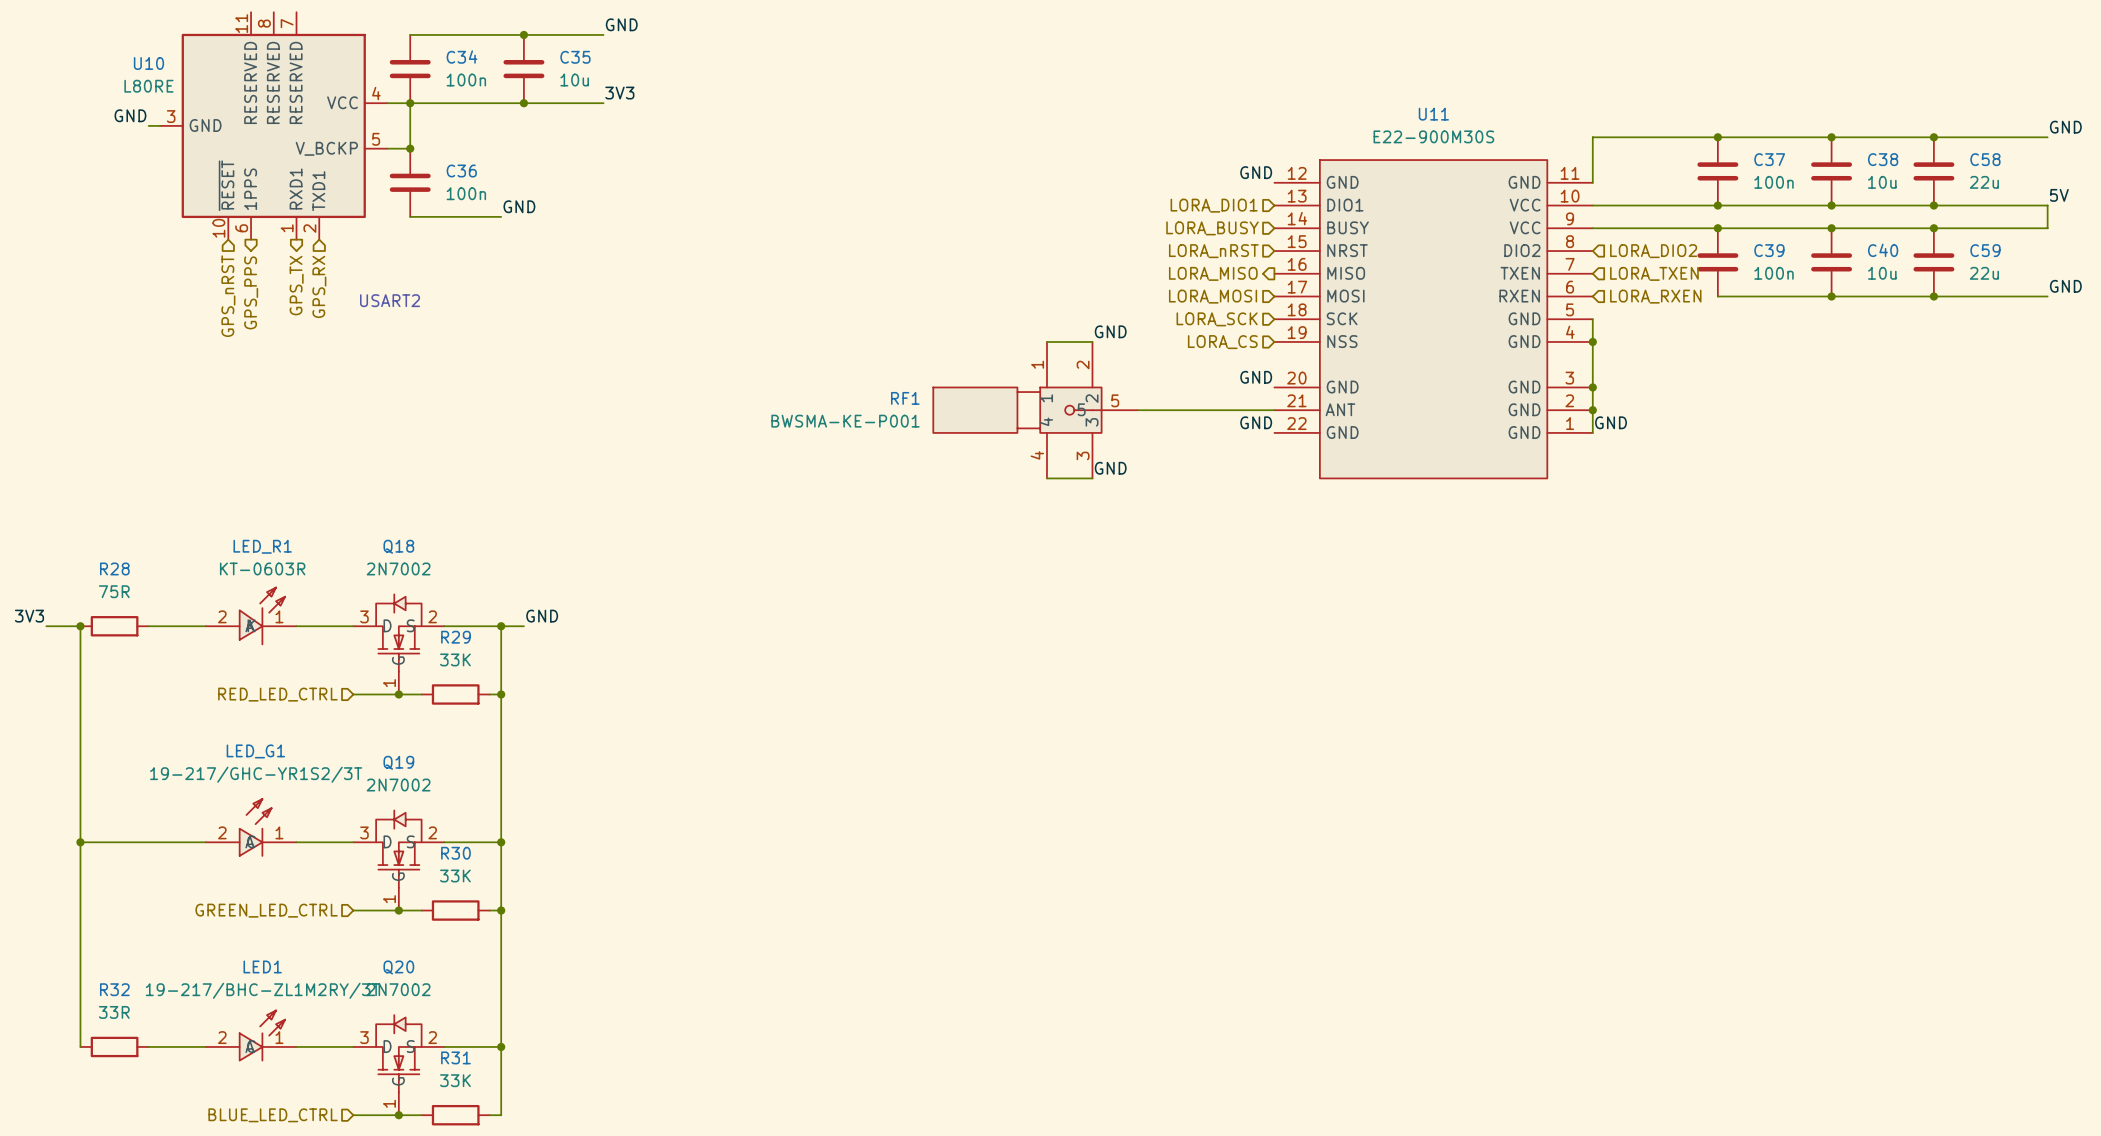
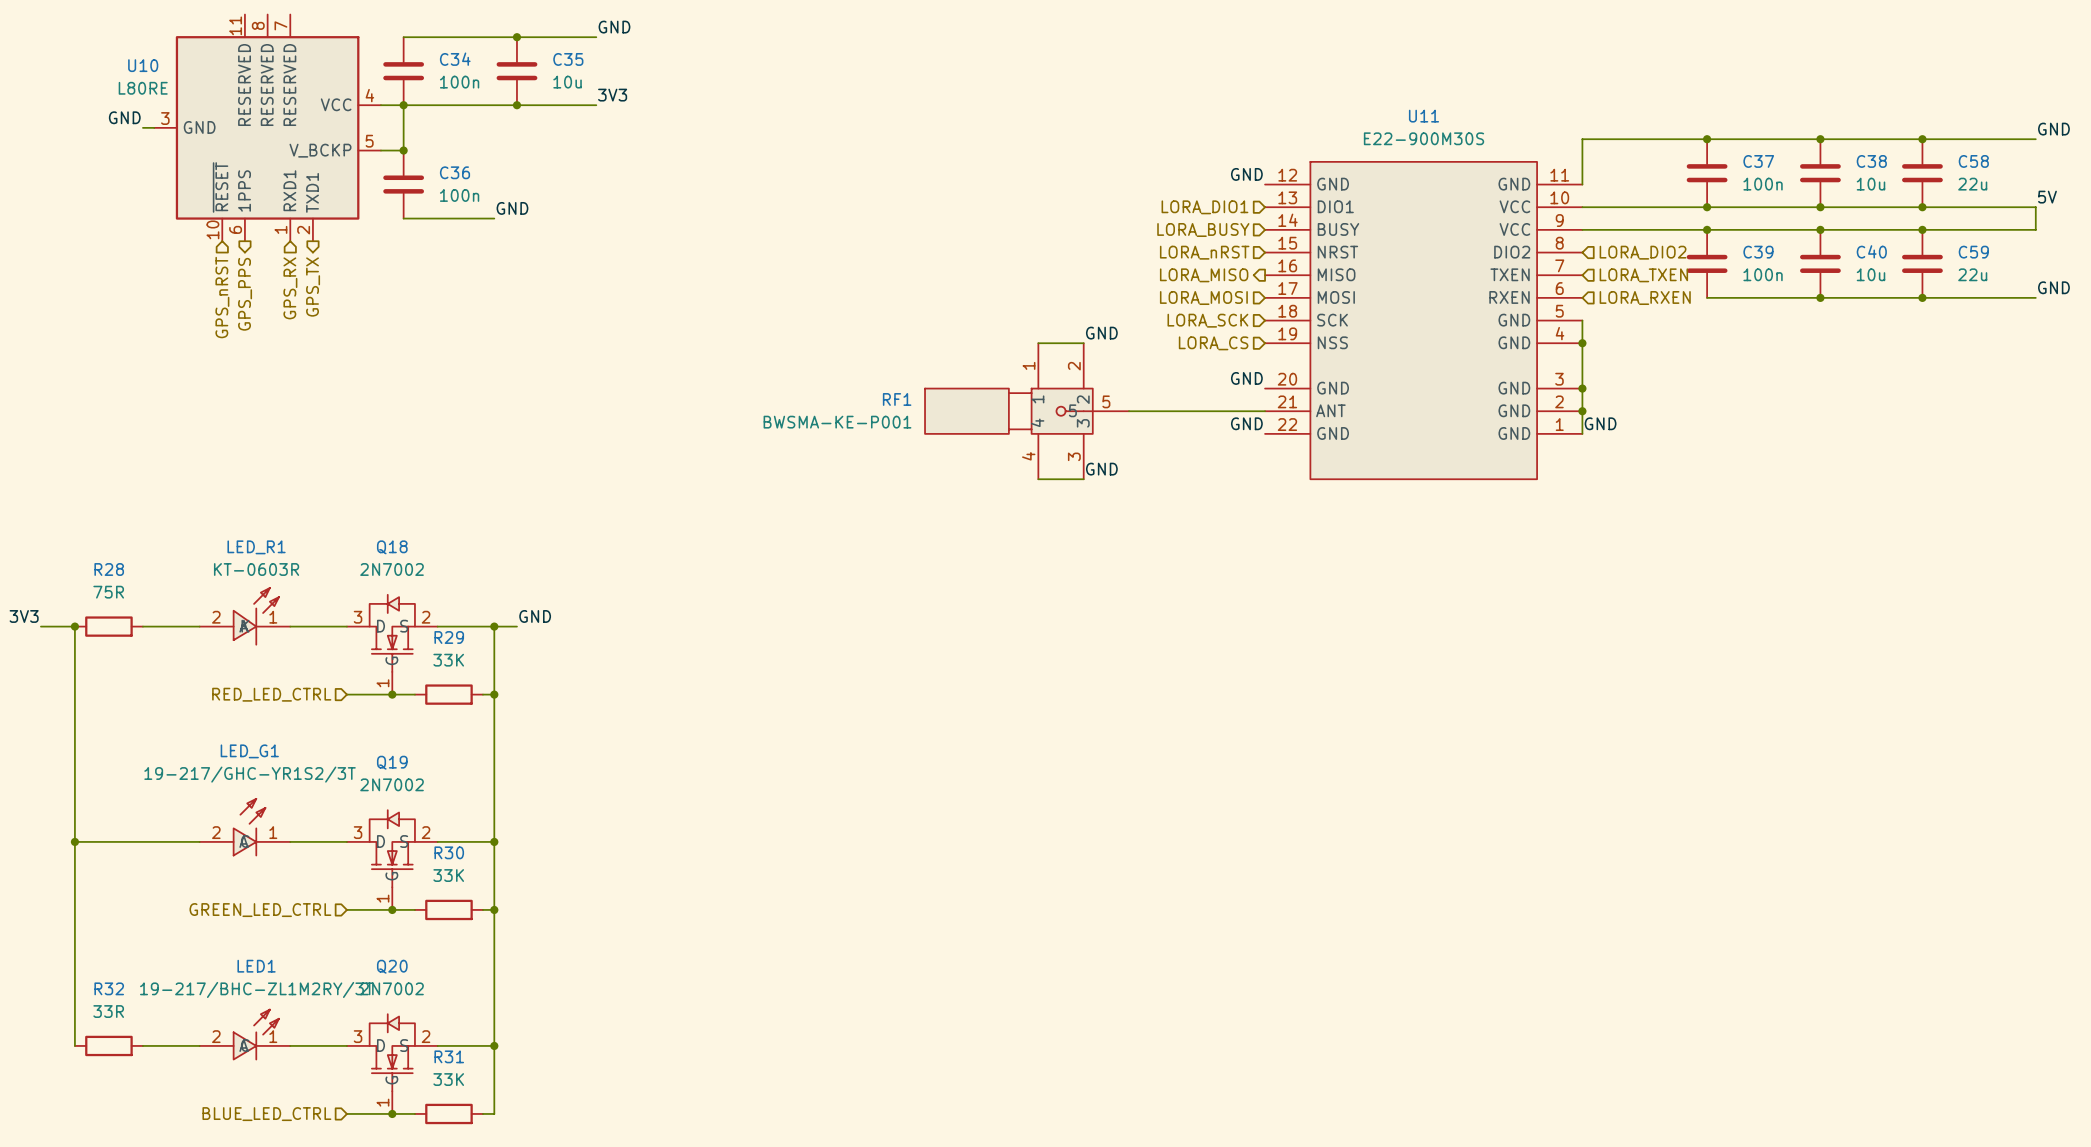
hierarchical label shape: output (296, 285) -> input (290, 288)
hierarchical label: GPS_TX (296, 285) -> GPS_RX (290, 288)
hierarchical label shape: input (319, 286) -> output (313, 287)
hierarchical label: GPS_RX (319, 286) -> GPS_TX (313, 287)
text: USART2 (390, 300) -> none

